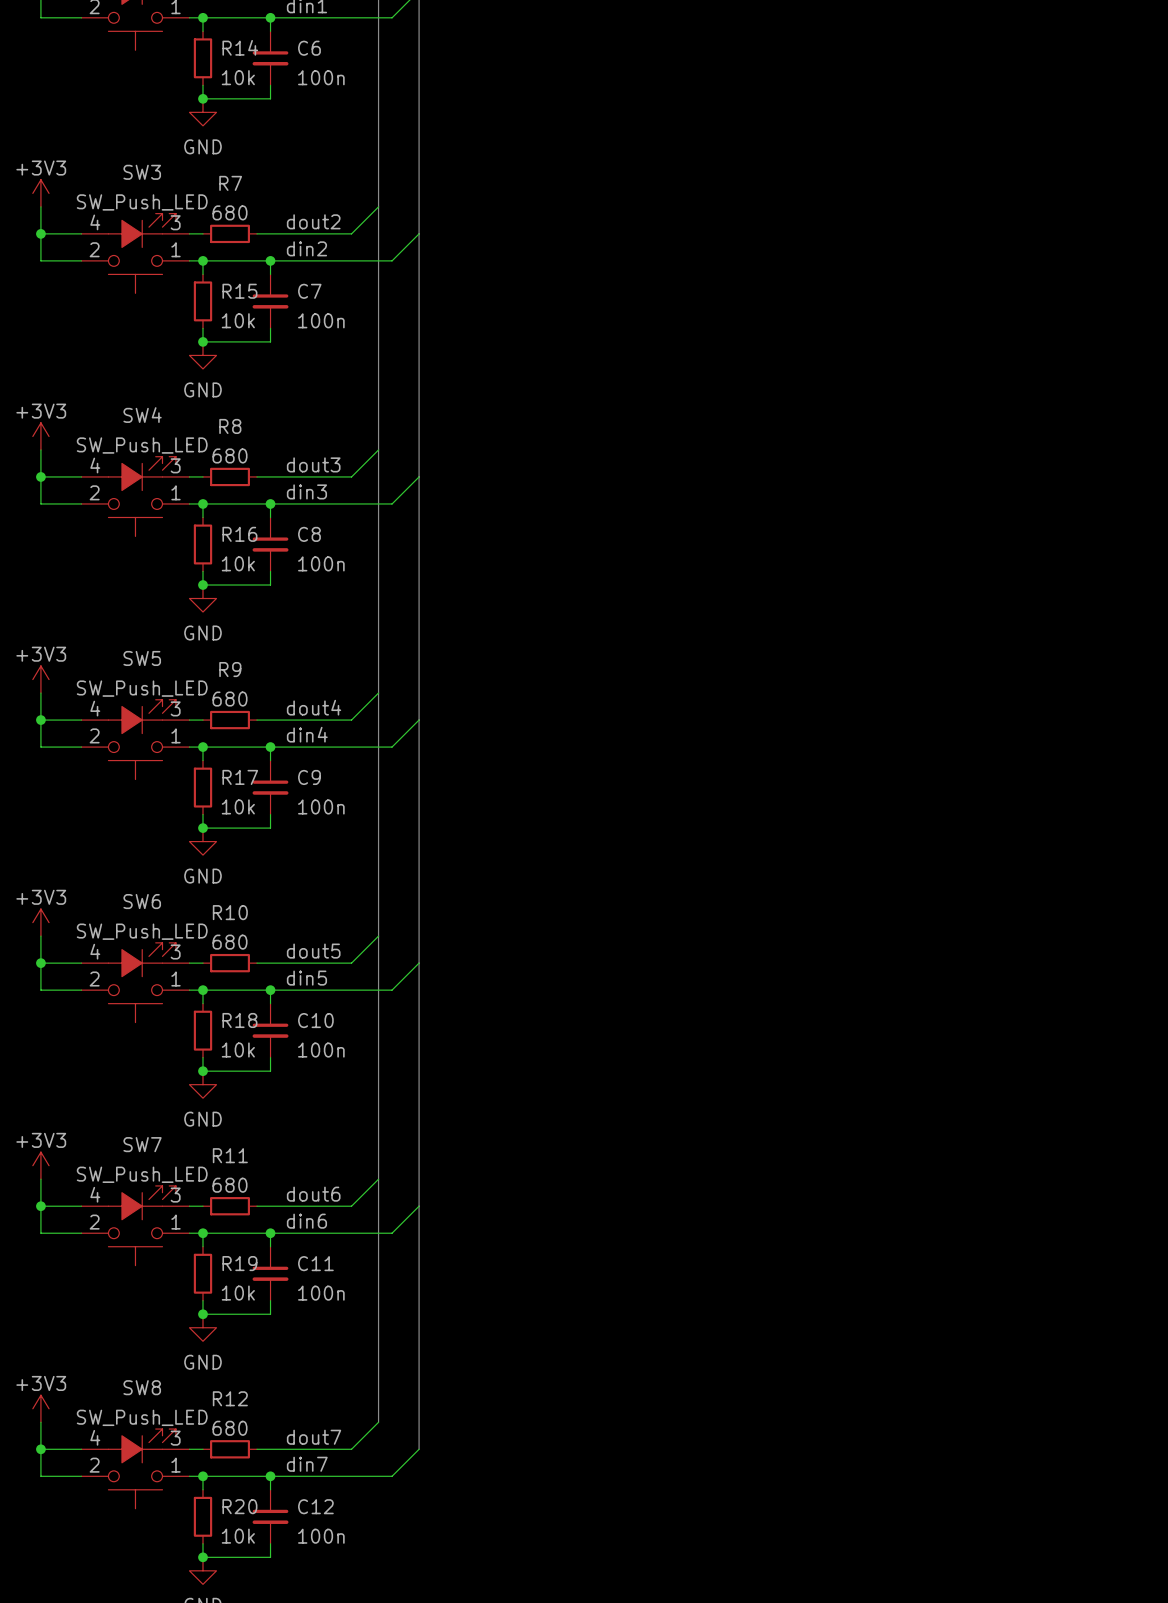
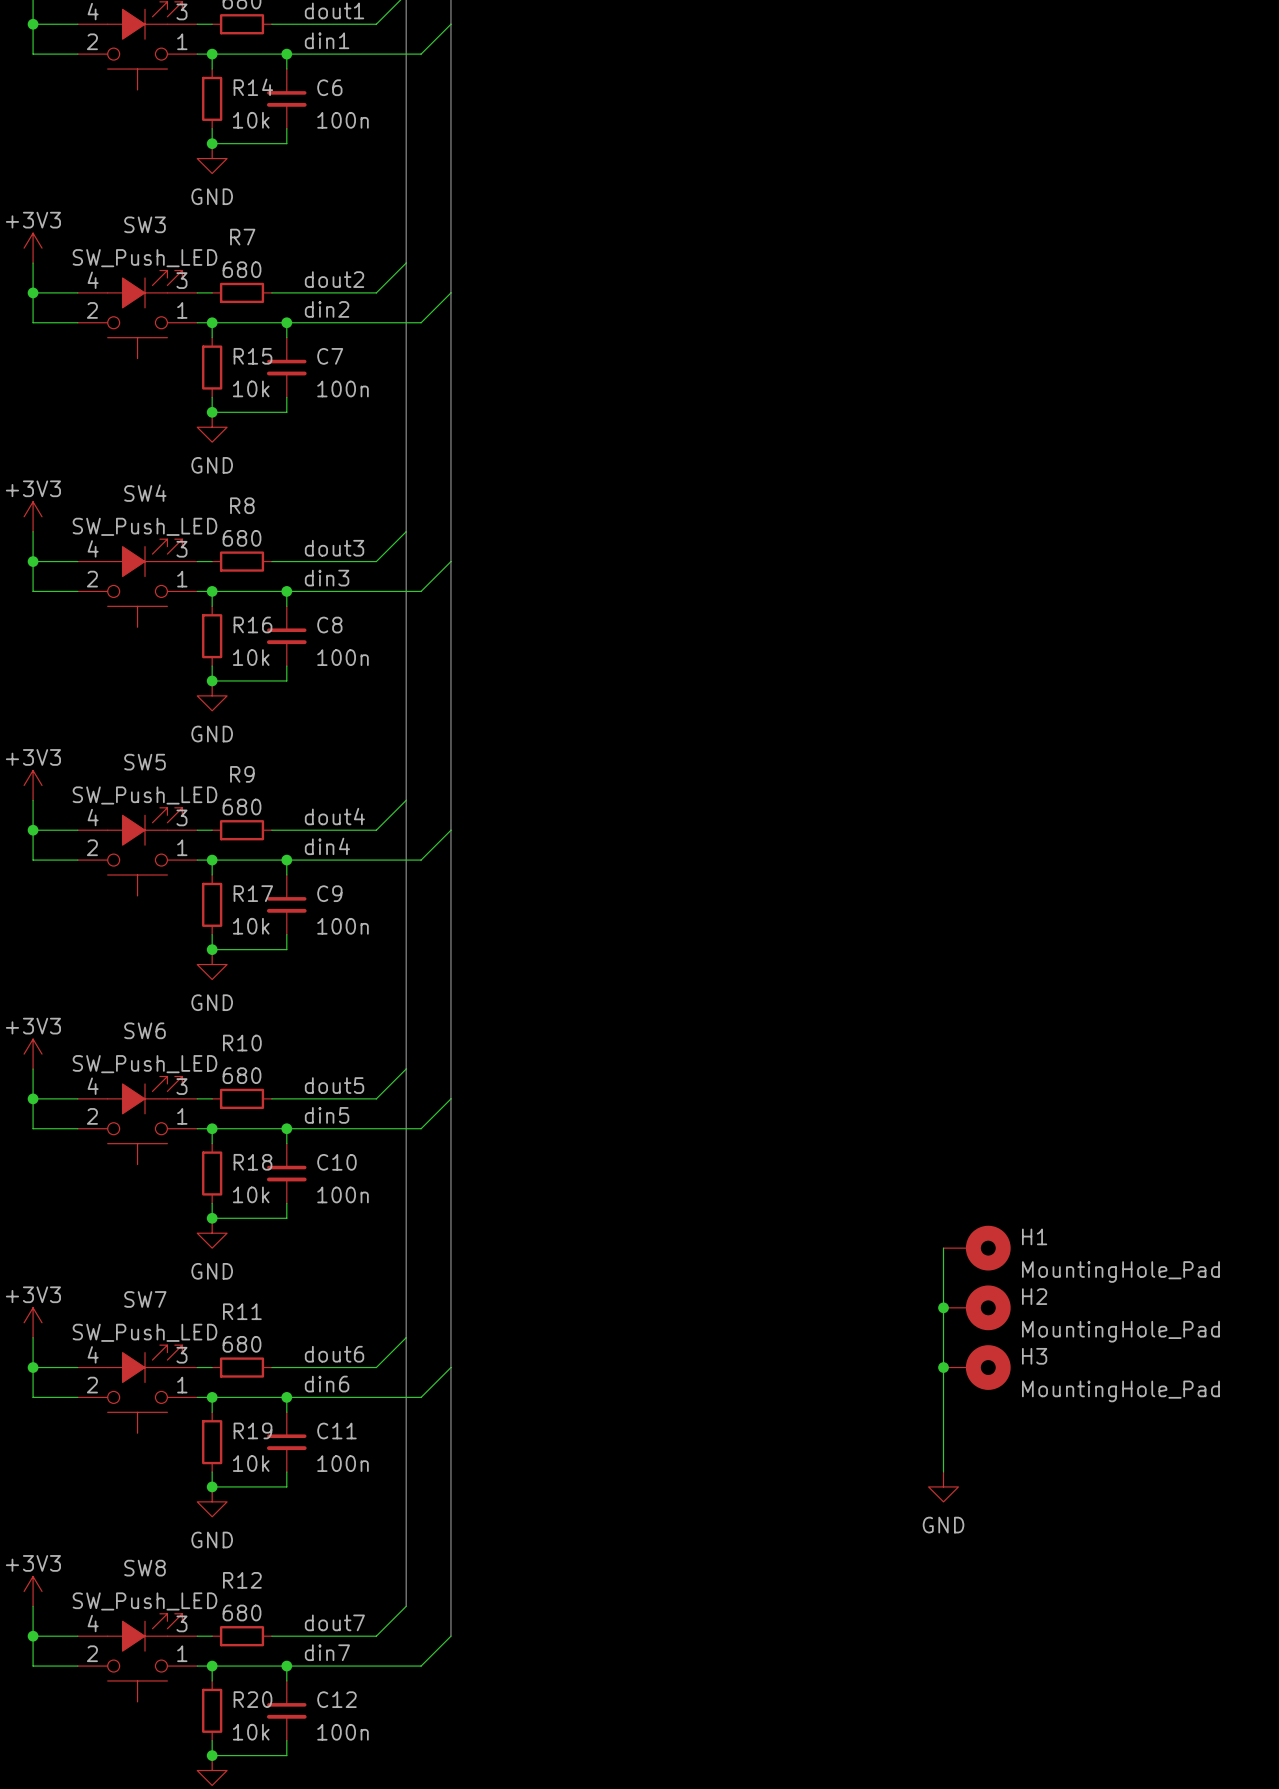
wire: none -> (943, 1248) (943, 1472)
H1: none -> MountingHole_Pad (977, 1248)
junction: none -> (943, 1307)
H2: none -> MountingHole_Pad (977, 1307)
junction: none -> (943, 1367)
H3: none -> MountingHole_Pad (977, 1367)
power symbol: none -> GND (943, 1486)

